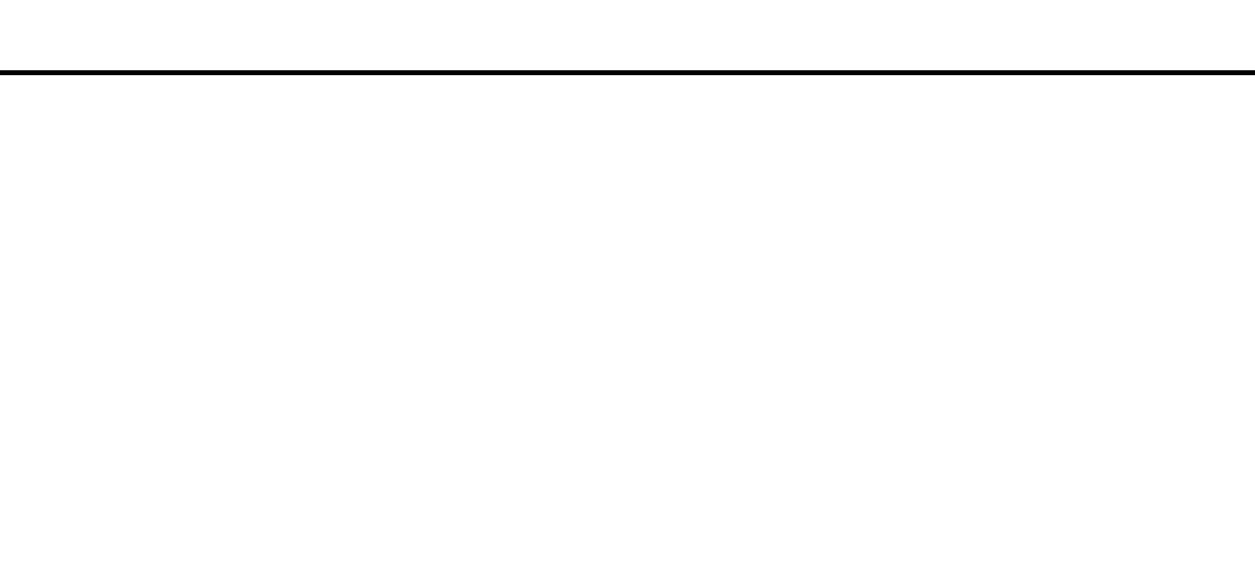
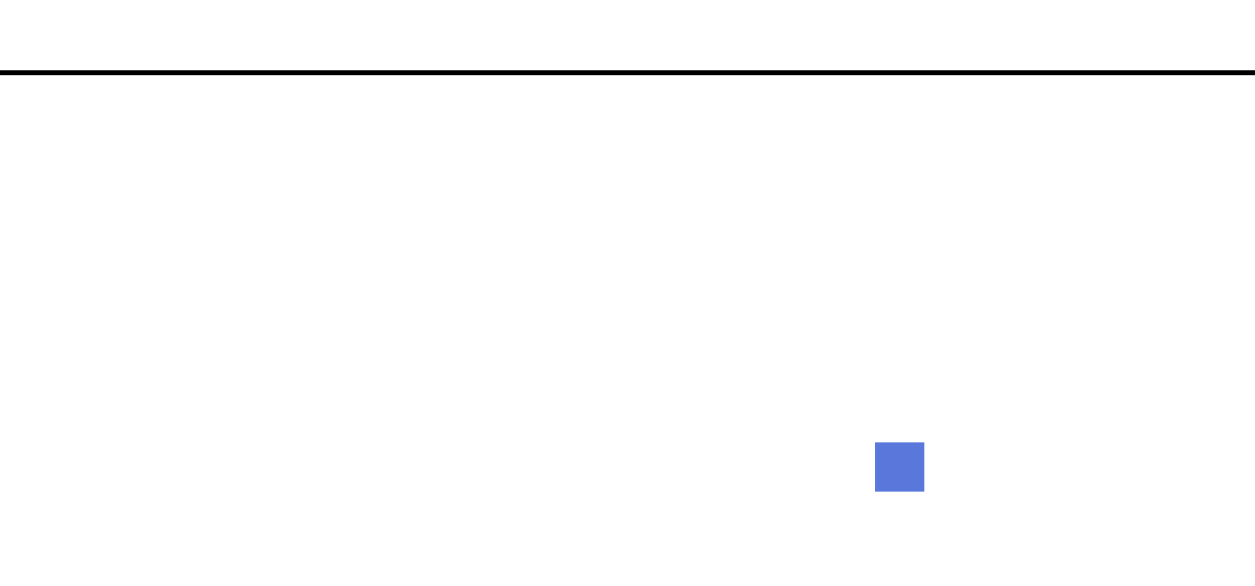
part: none -> (899, 466)

